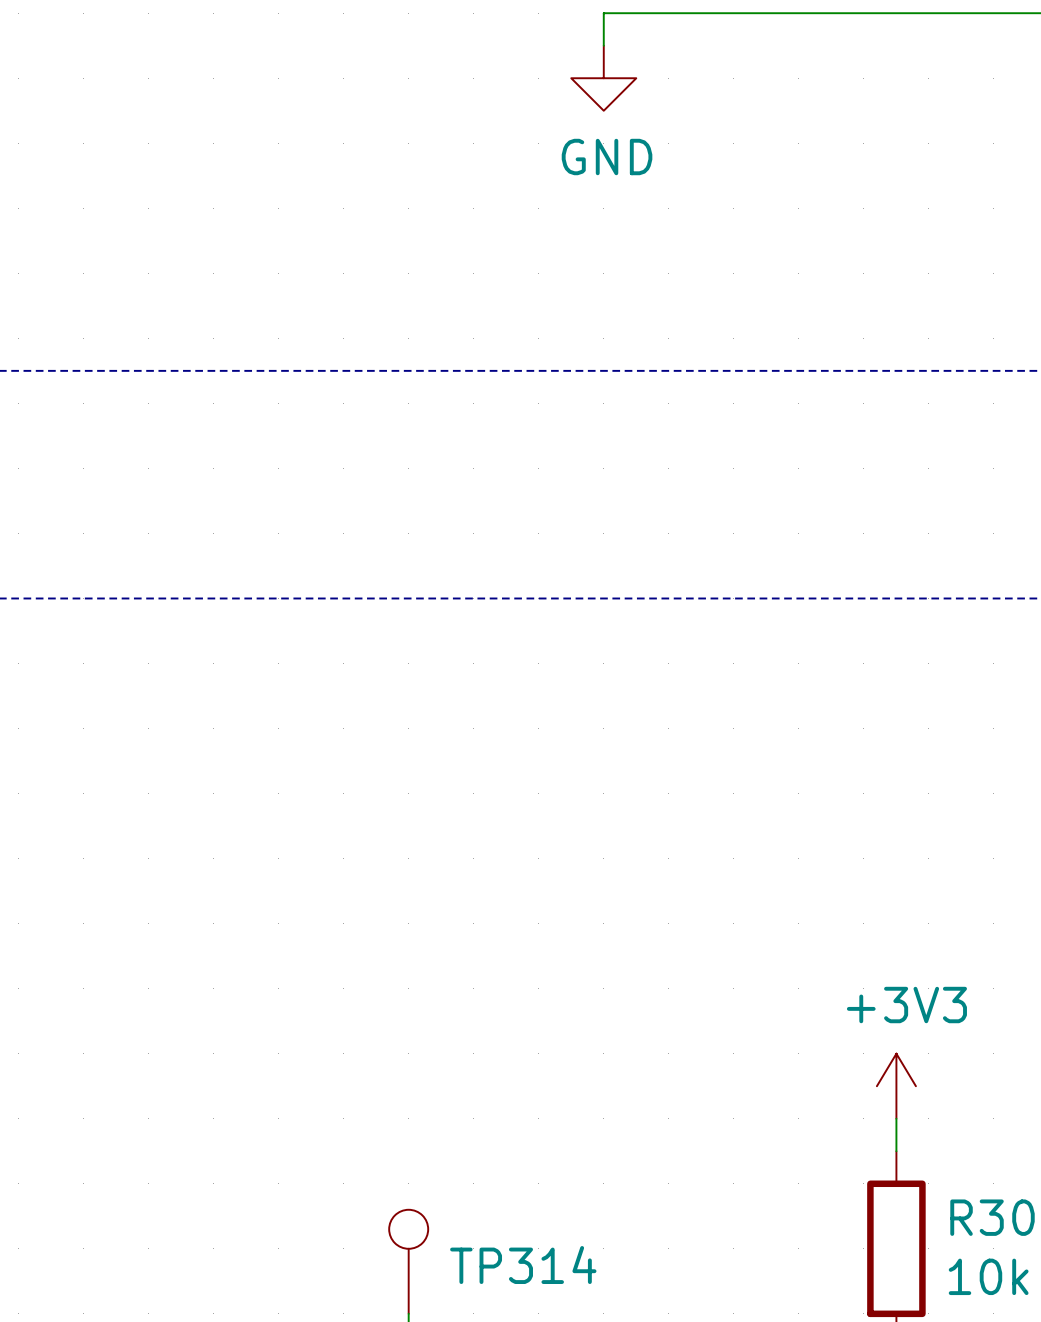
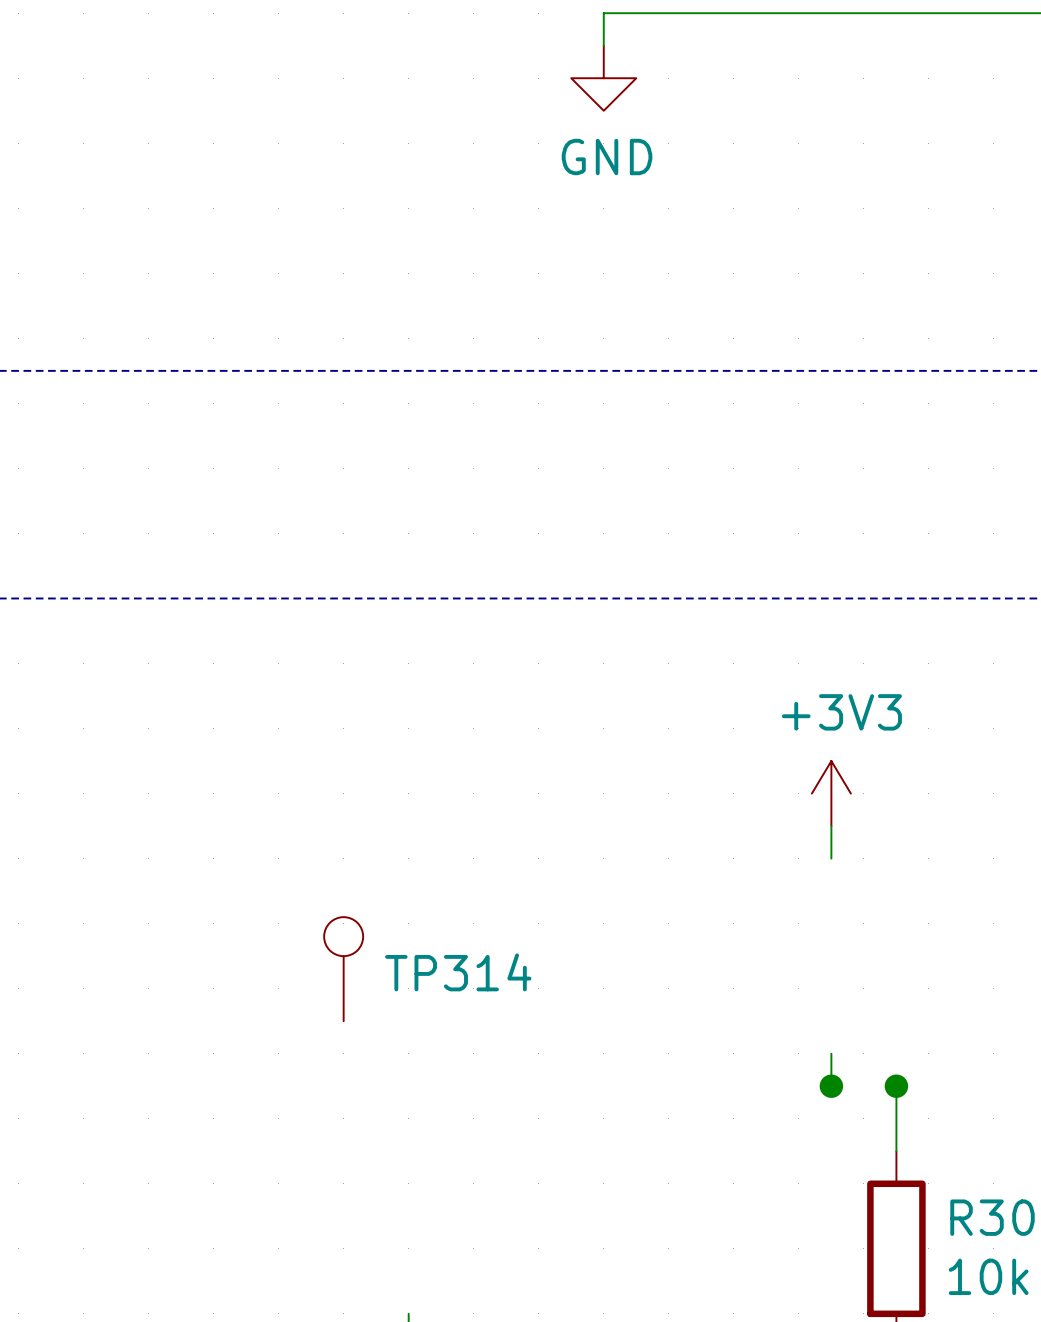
power symbol: none -> +3V3 (831, 793)
wire: none -> (831, 826) (831, 858)
wire: none -> (831, 1053) (831, 1086)
junction: none -> (831, 1086)
power symbol: +3V3 (896, 1086) -> none
junction: none -> (896, 1086)
TP314 position: (408, 1261) -> (343, 969)

